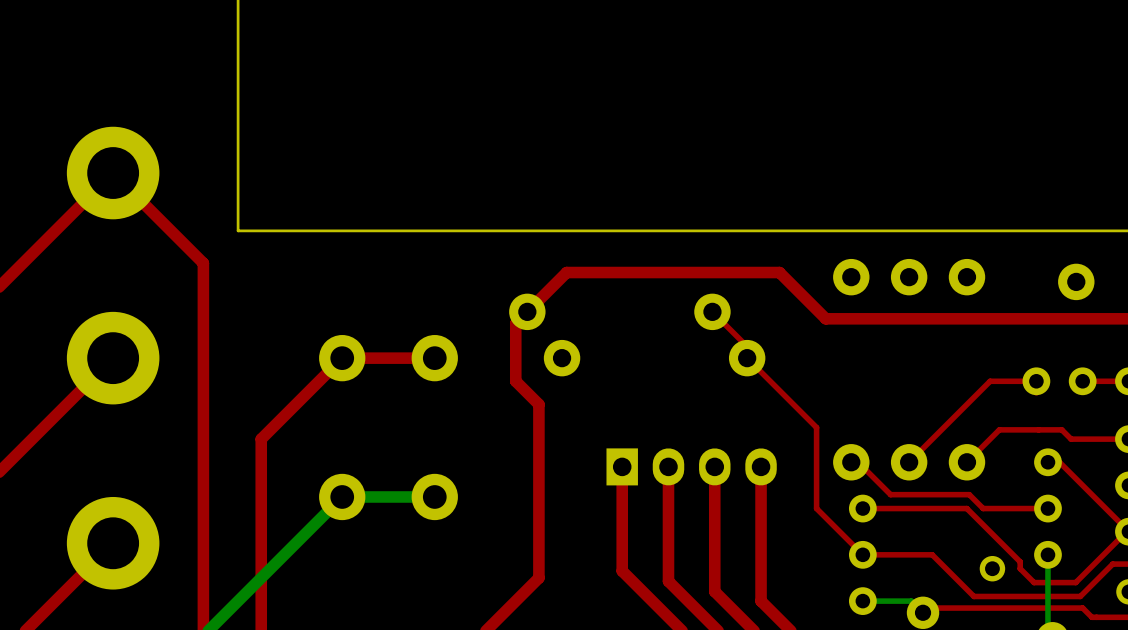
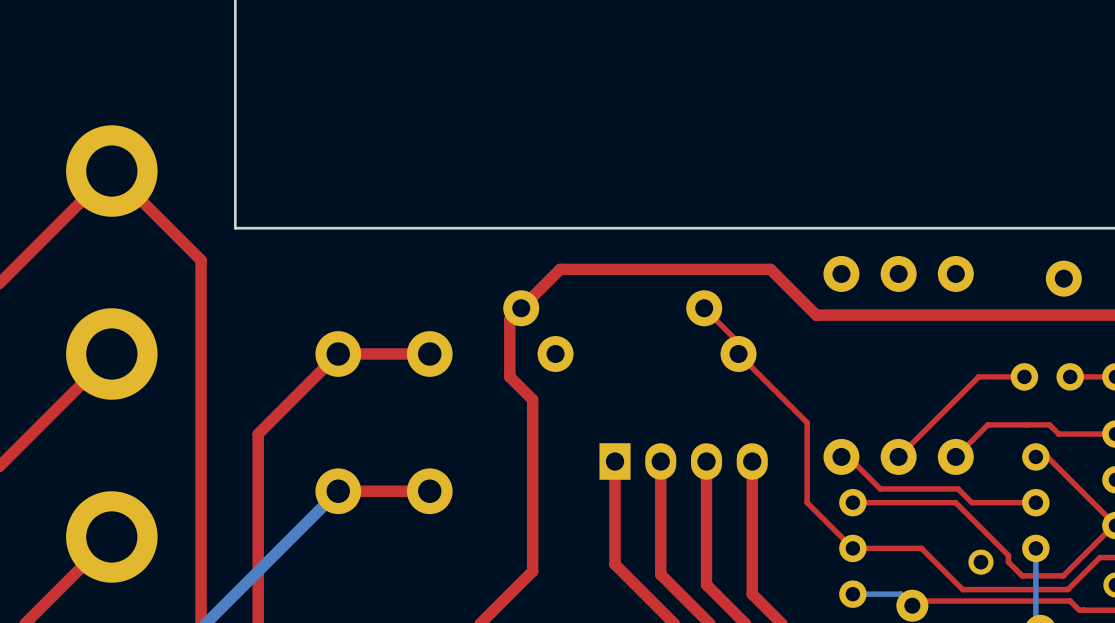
top track: none -> (429, 491) (338, 491)
bottom track: (434, 496) (342, 496) -> none

